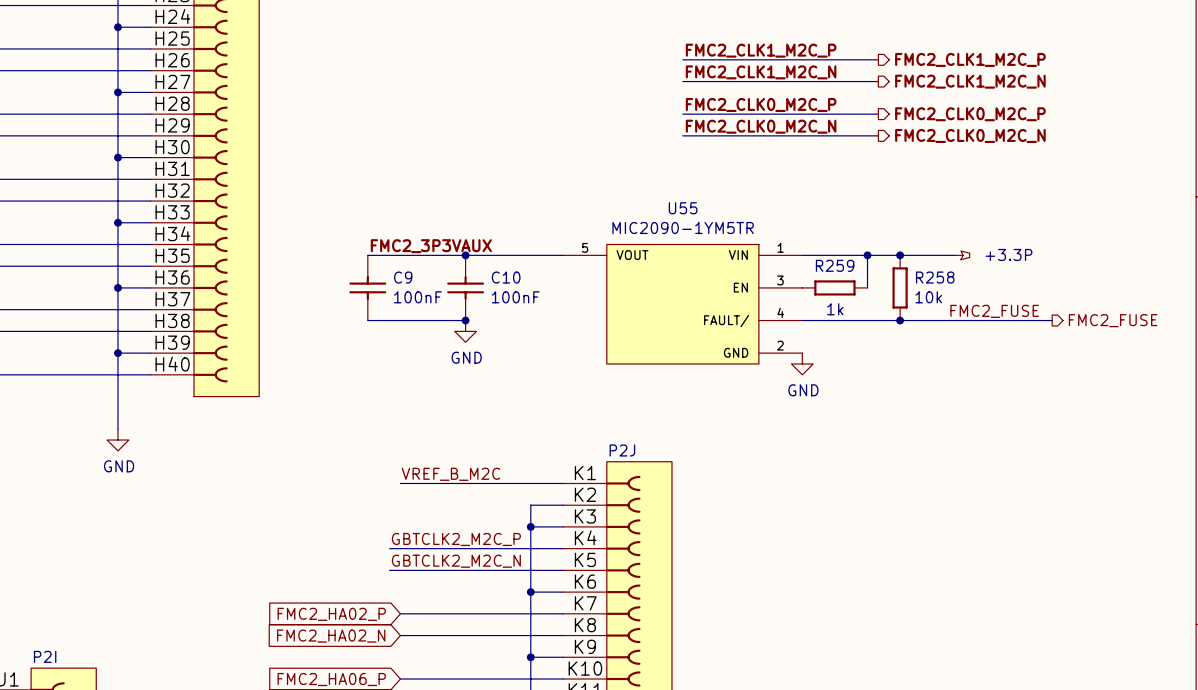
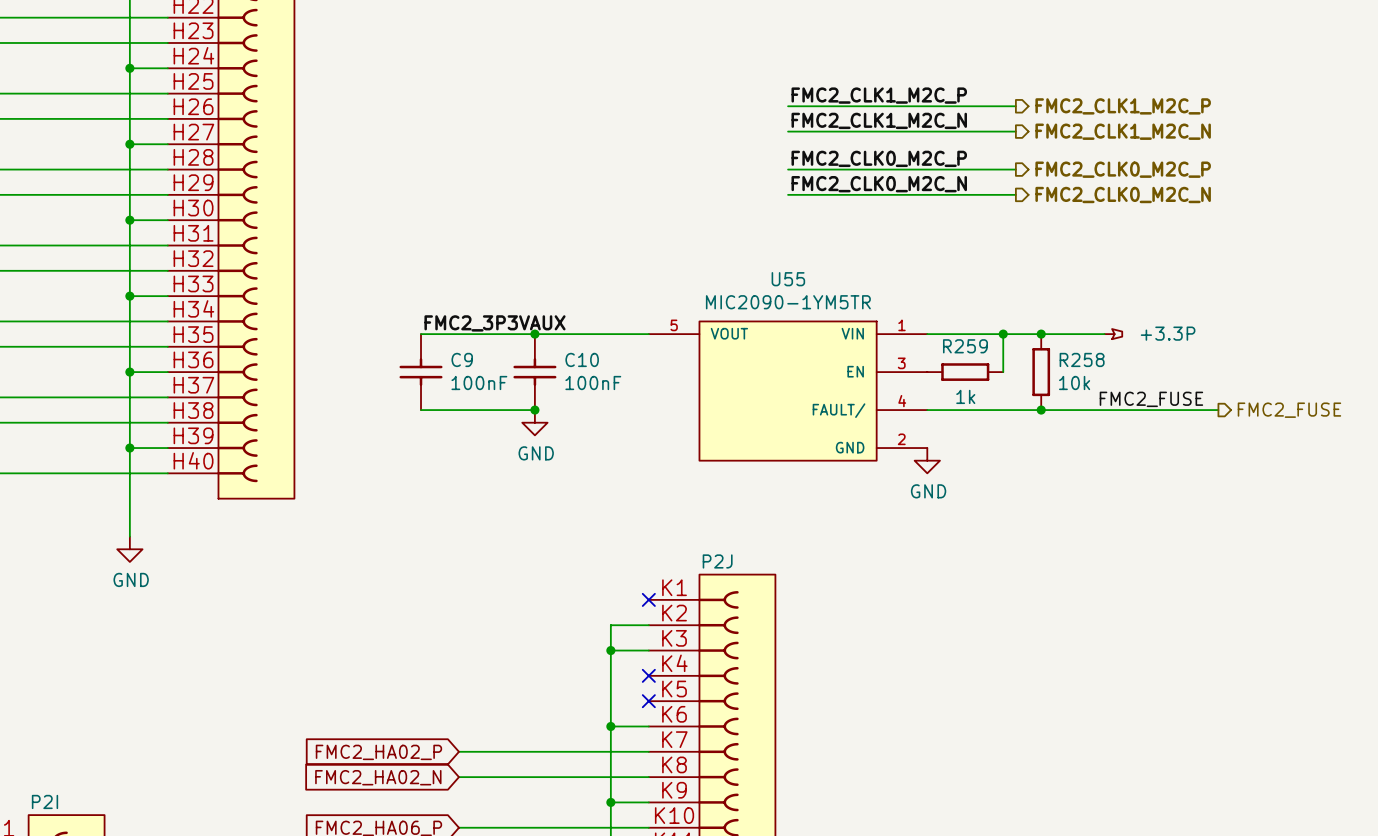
label: VREF_B_M2C (450, 474) -> none
wire: (400, 483) (563, 483) -> none
no-connect mark: none -> (648, 599)
label: GBTCLK2_M2C_P (456, 539) -> none
wire: (389, 548) (563, 548) -> none
no-connect mark: none -> (648, 675)
label: GBTCLK2_M2C_N (456, 561) -> none
wire: (389, 570) (563, 570) -> none
no-connect mark: none -> (648, 701)

